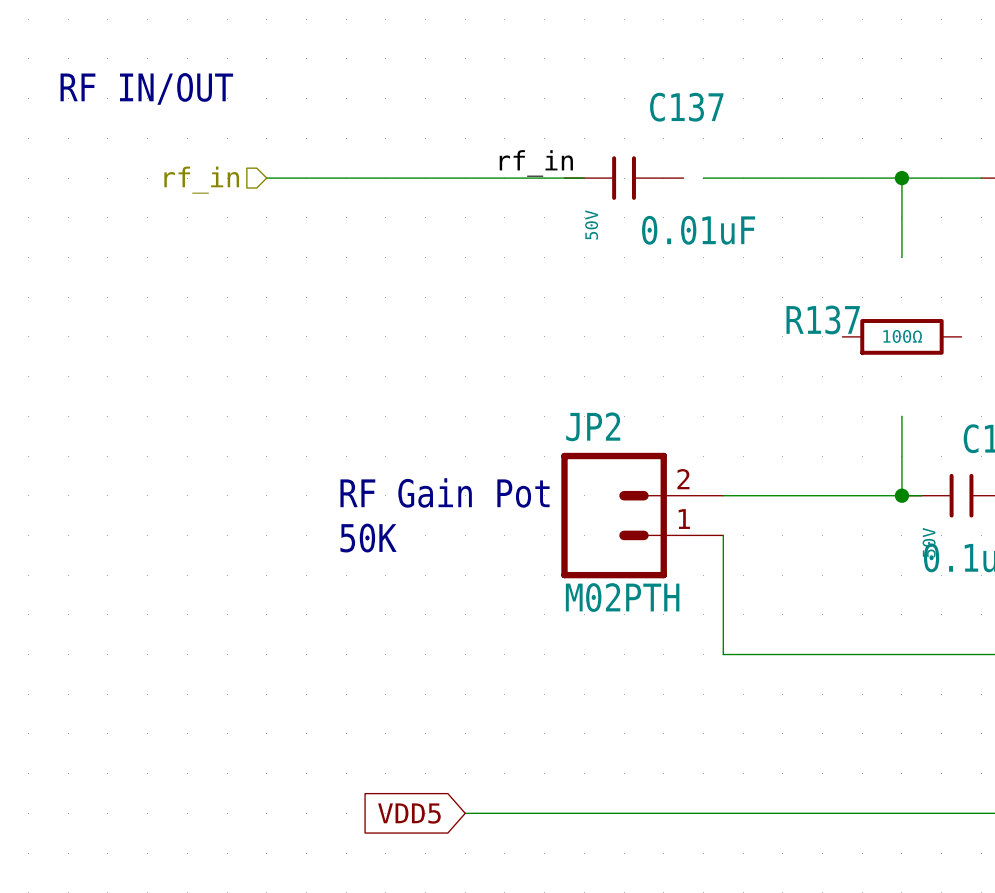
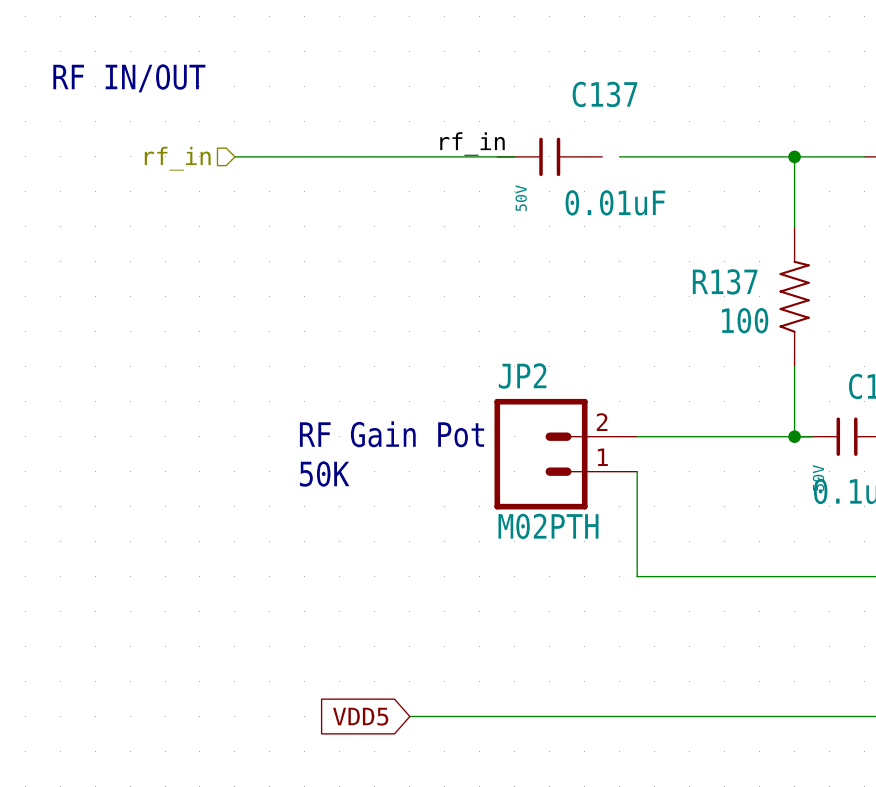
R137 symbol: [842, 319, 962, 355] -> [779, 226, 810, 367]
R137 value: 100Ω (902, 336) -> 100 (745, 320)

